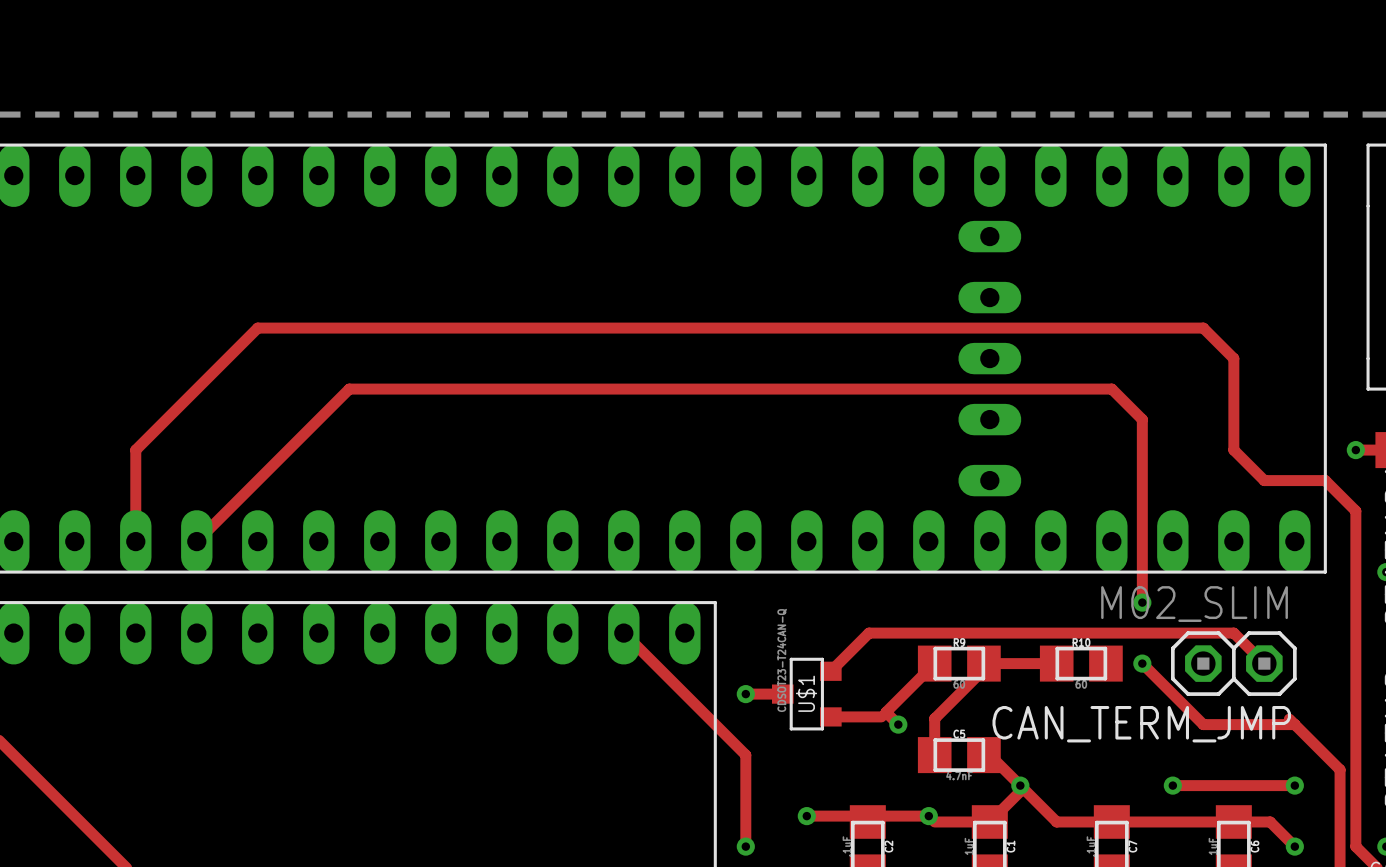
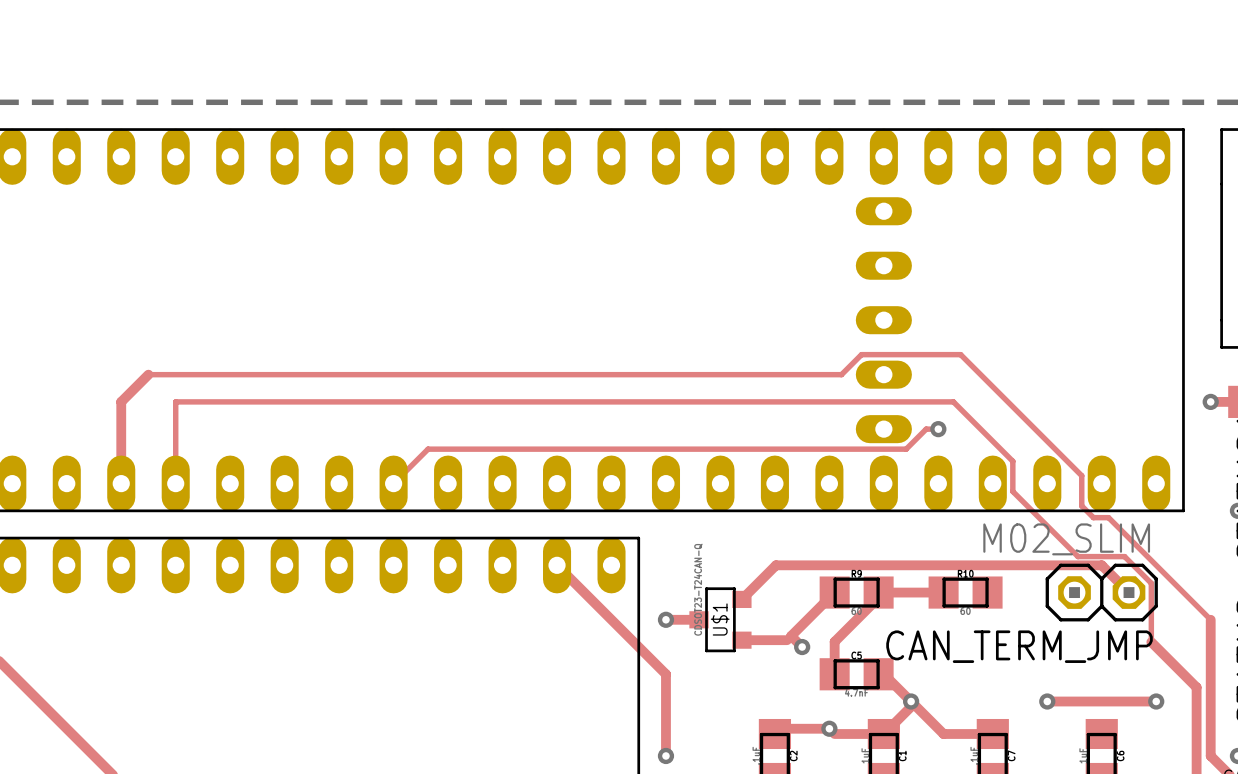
track: (166, 419) (257, 328) (1203, 328) (1233, 358) (1233, 450) (1264, 480) (1325, 480) (1355, 511) (1355, 694) -> (148, 374) (841, 374) (861, 354) (960, 354) (1081, 475) (1081, 505) (1093, 517) (1108, 517) (1210, 619)
track: none -> (938, 429) (926, 429) (906, 449) (428, 449) (393, 483)
via: none -> (938, 429)
track: (196, 541) (349, 389) (1111, 389) (1142, 419) (1142, 602) -> (175, 483) (175, 401) (953, 401) (1012, 461) (1012, 491) (1077, 556) (1124, 556) (1151, 583) (1151, 642)
via: (1142, 602) -> none
track: (1142, 663) (1203, 724) (1294, 724) -> none
via: (1142, 663) -> none
track: (806, 816) (861, 816) (867, 821) -> none
via: (806, 816) -> none
track: (1111, 821) (1270, 821) (1294, 846) -> none
via: (1294, 846) -> none

